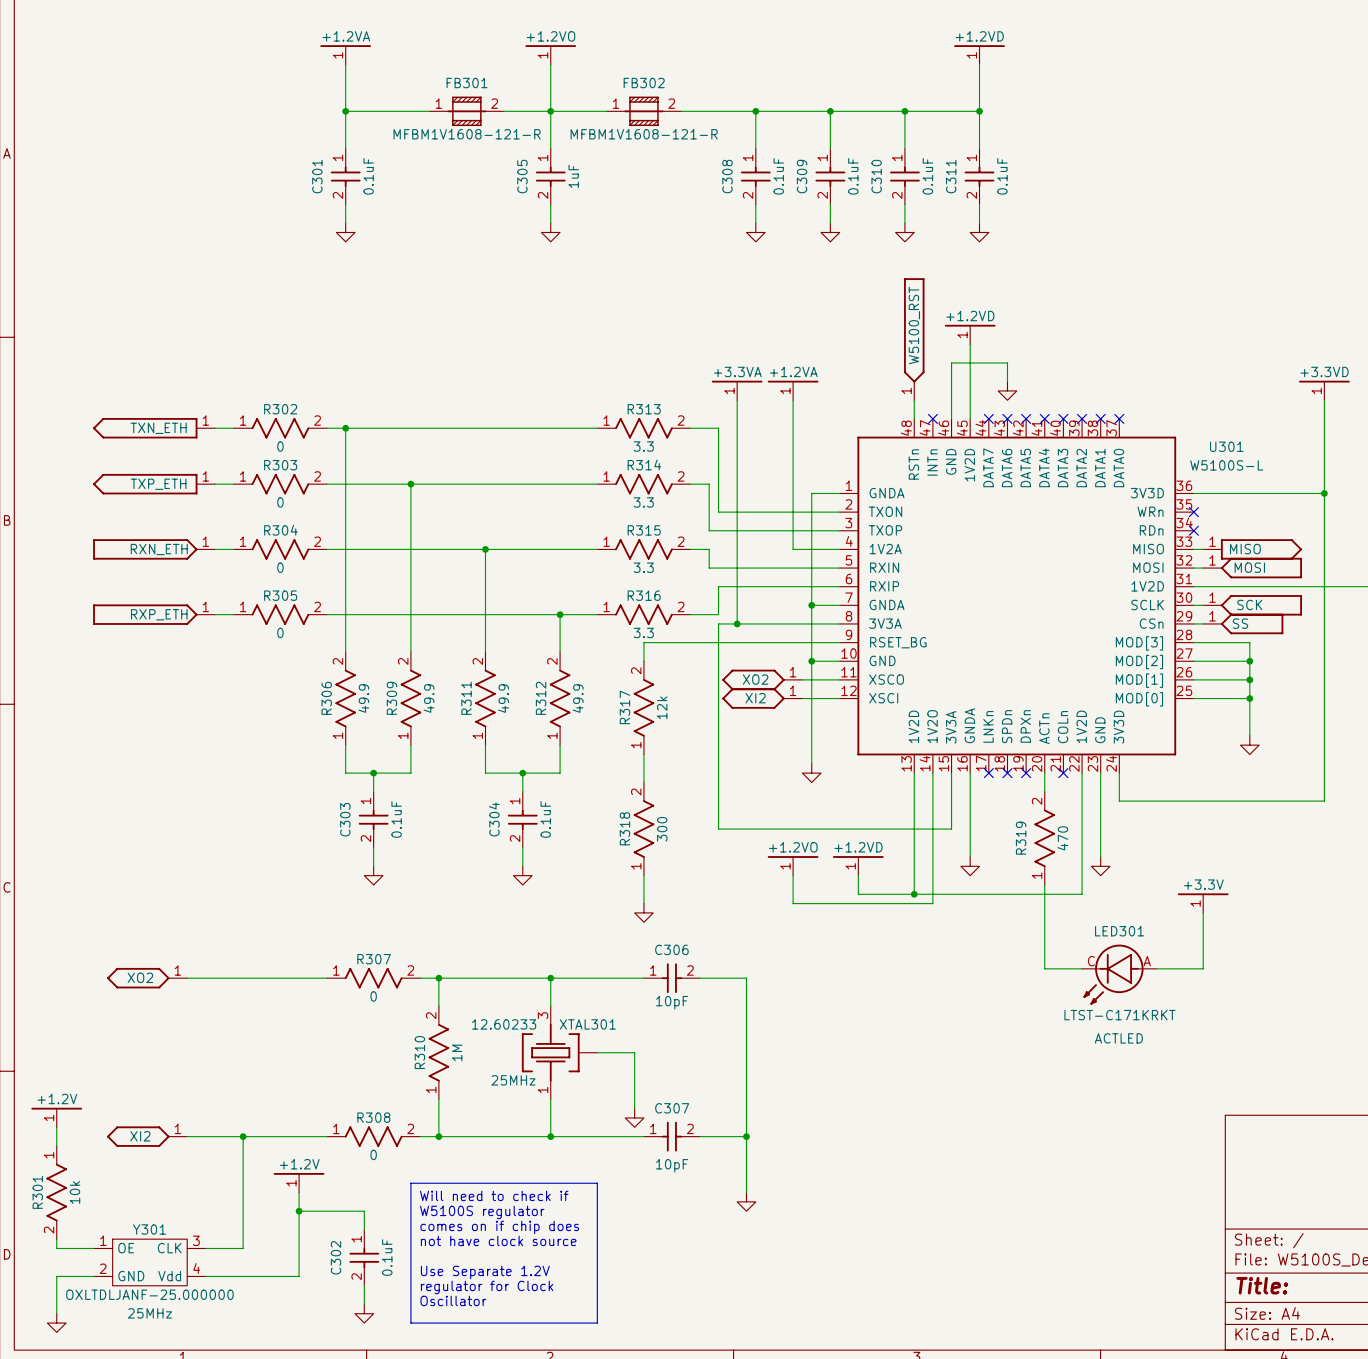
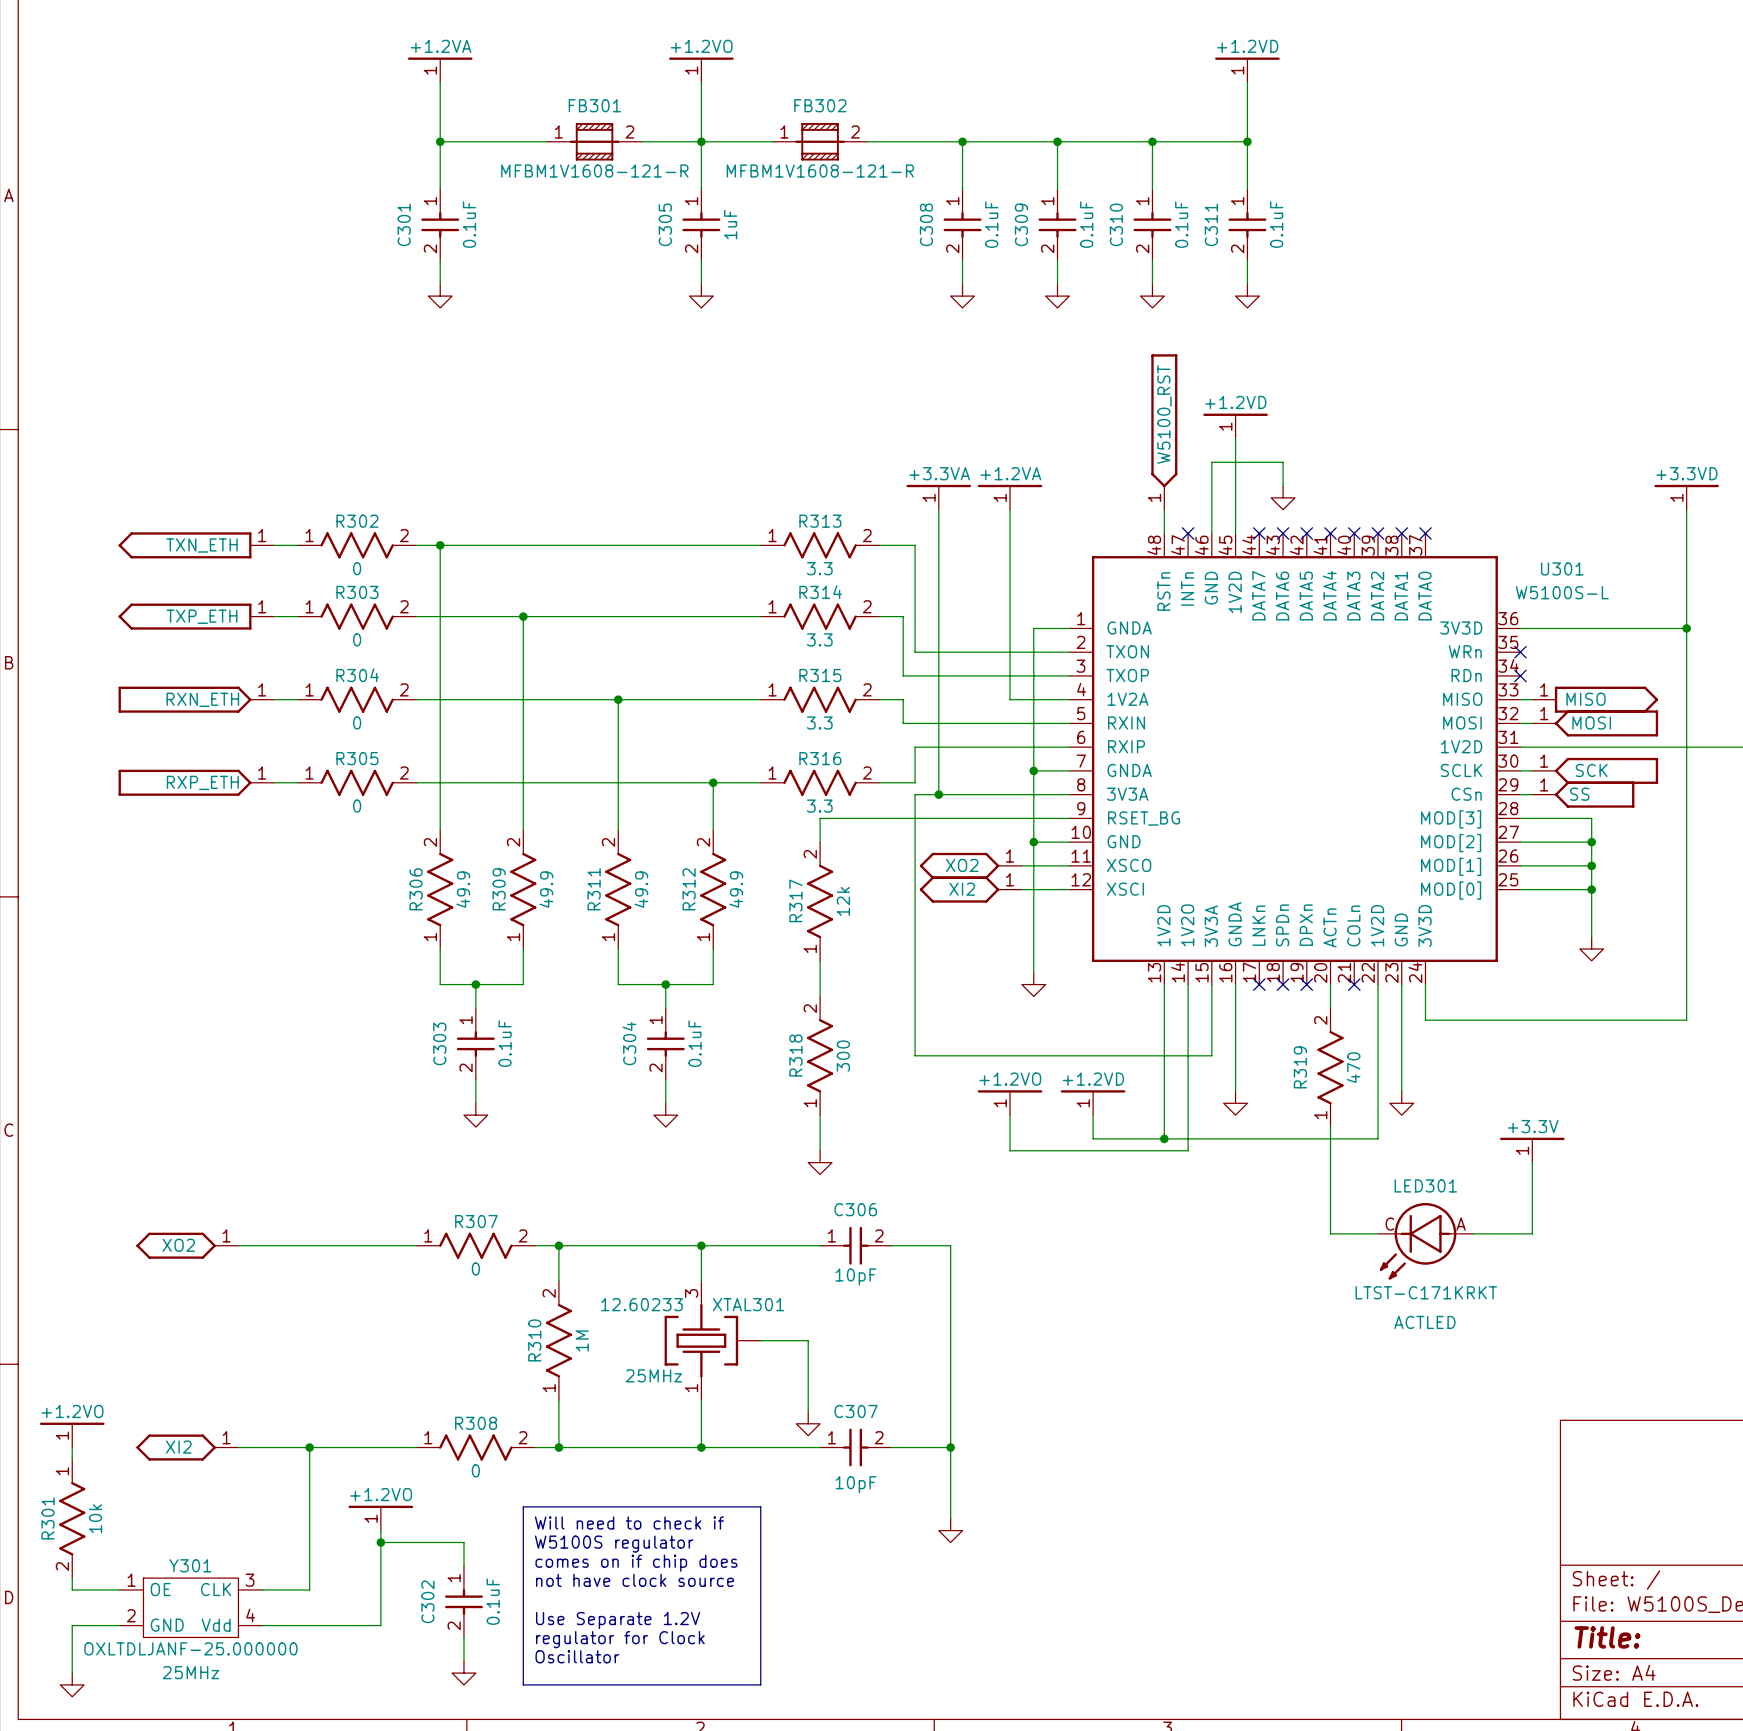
power symbol: +1.2V (56, 1117) -> none
power symbol: none -> +1.2VO (72, 1435)
power symbol: +1.2V (299, 1182) -> none
power symbol: none -> +1.2VO (380, 1518)

